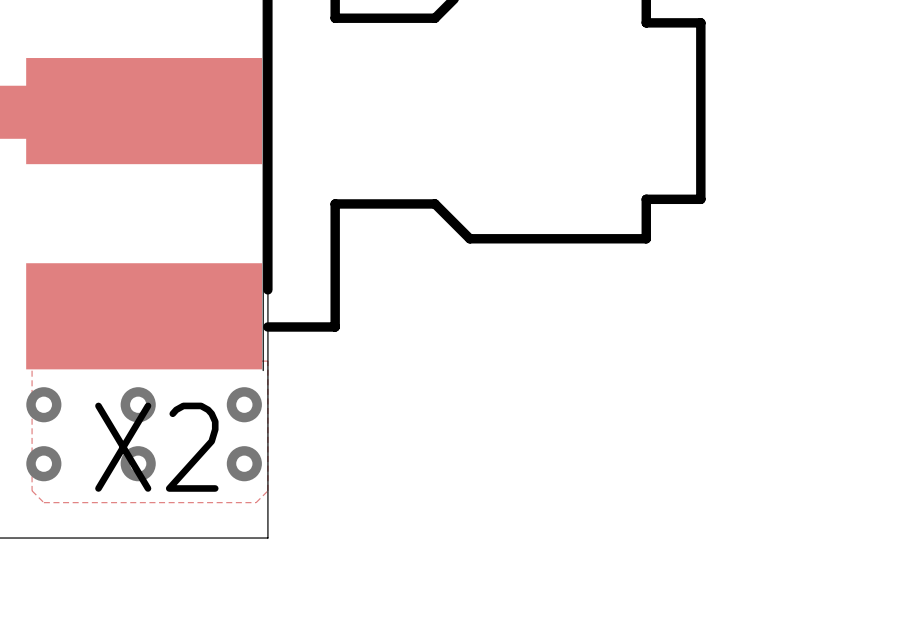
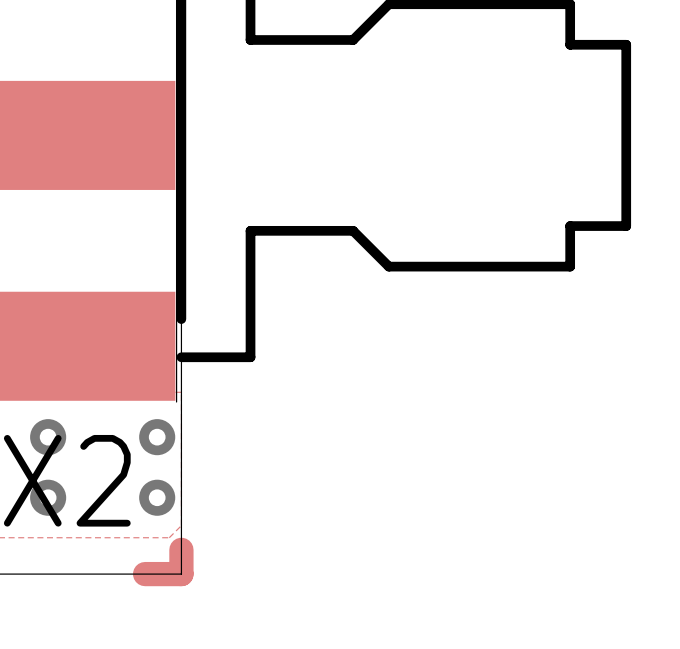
track: none -> (181, 549) (181, 574) (145, 574)

